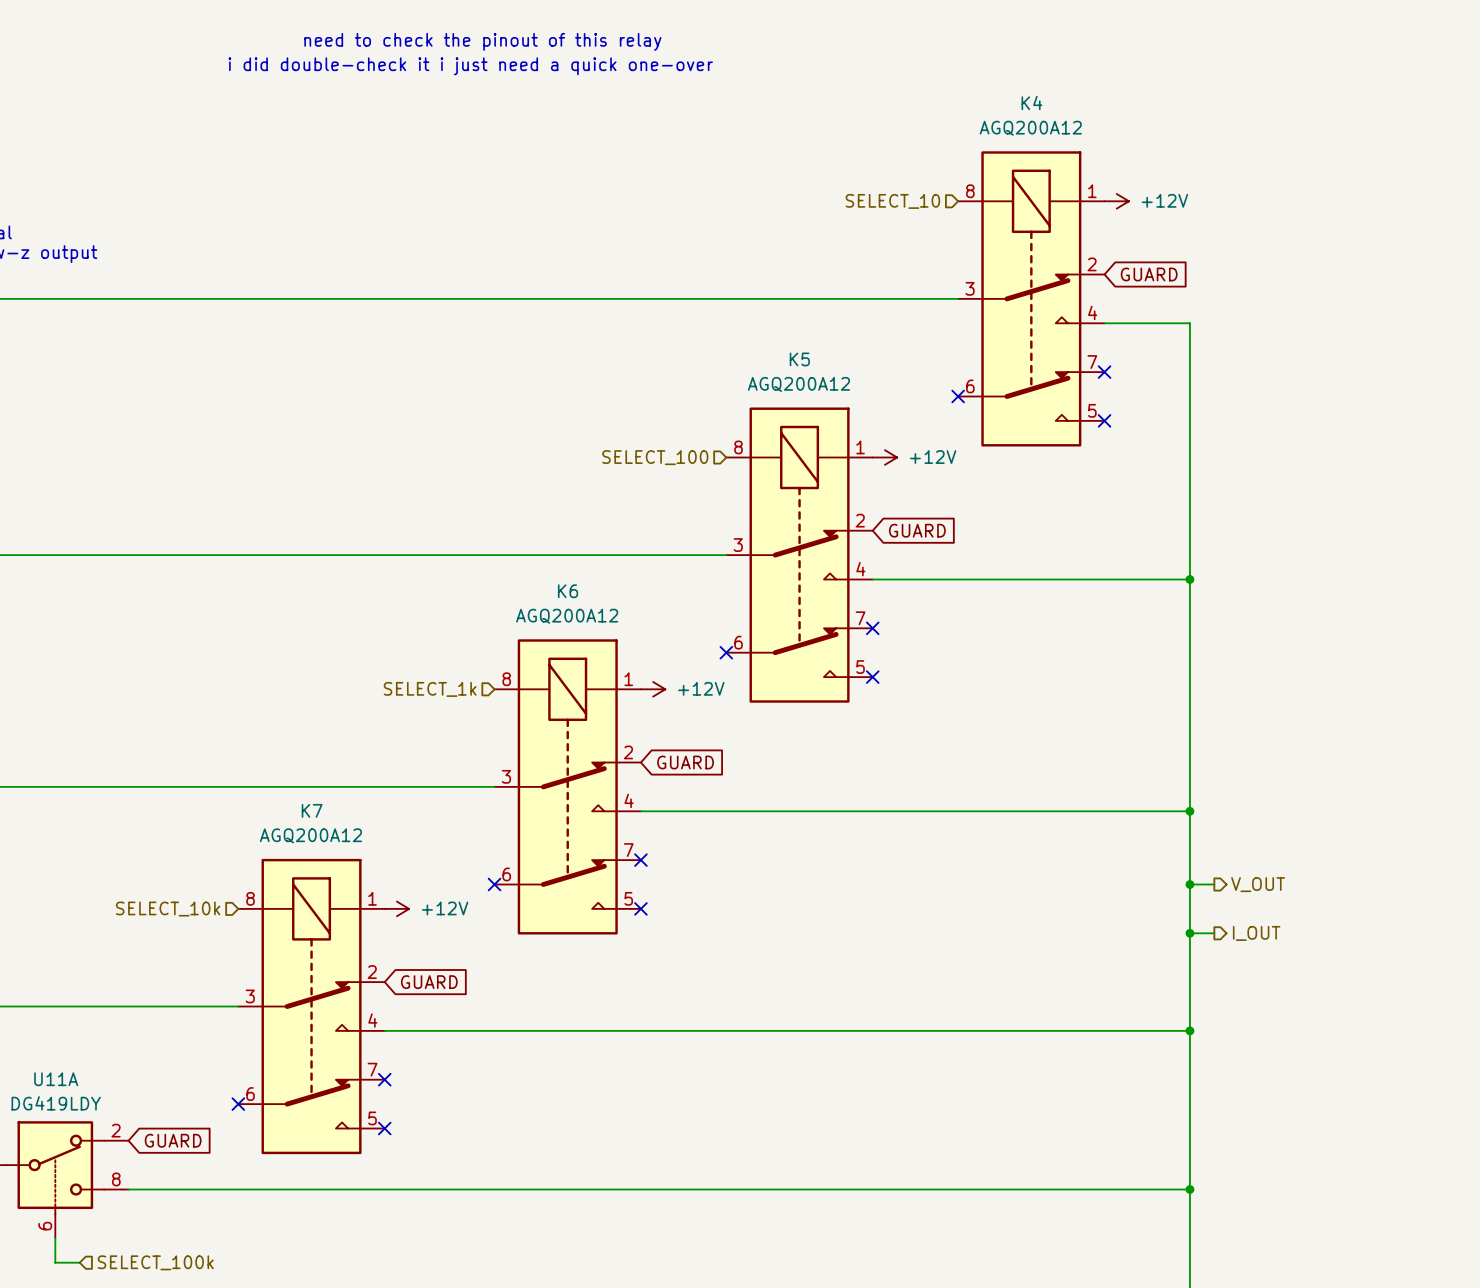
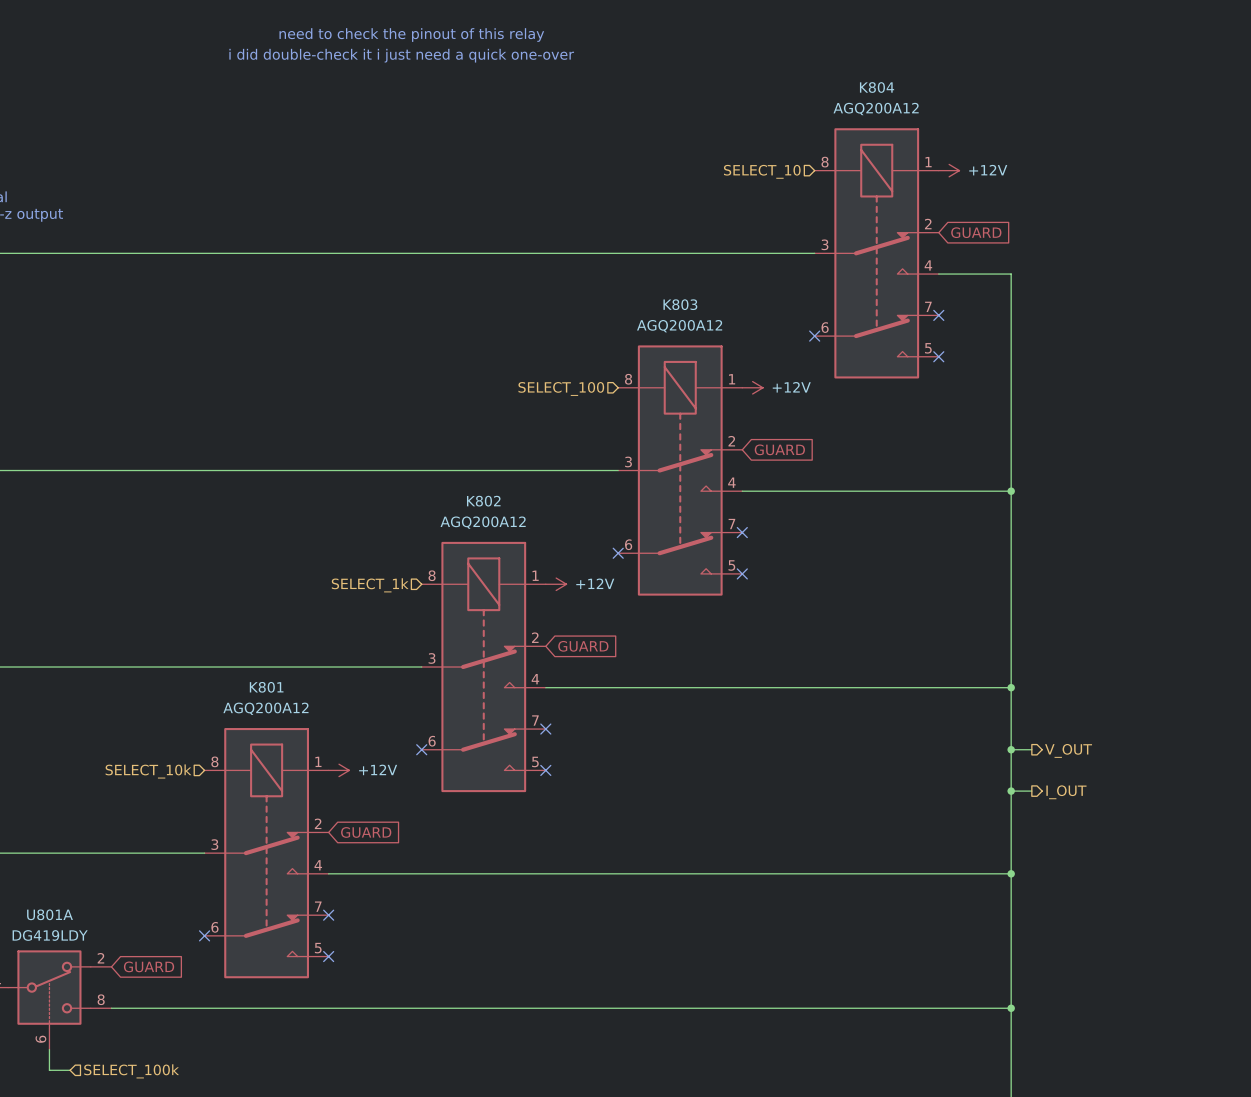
K4 name: K4 (1031, 102) -> K804 (877, 87)
K5 name: K5 (799, 359) -> K803 (680, 304)
K6 name: K6 (568, 591) -> K802 (483, 501)
K7 name: K7 (312, 810) -> K801 (266, 687)
U11A name: U11A (56, 1079) -> U801A (50, 914)

